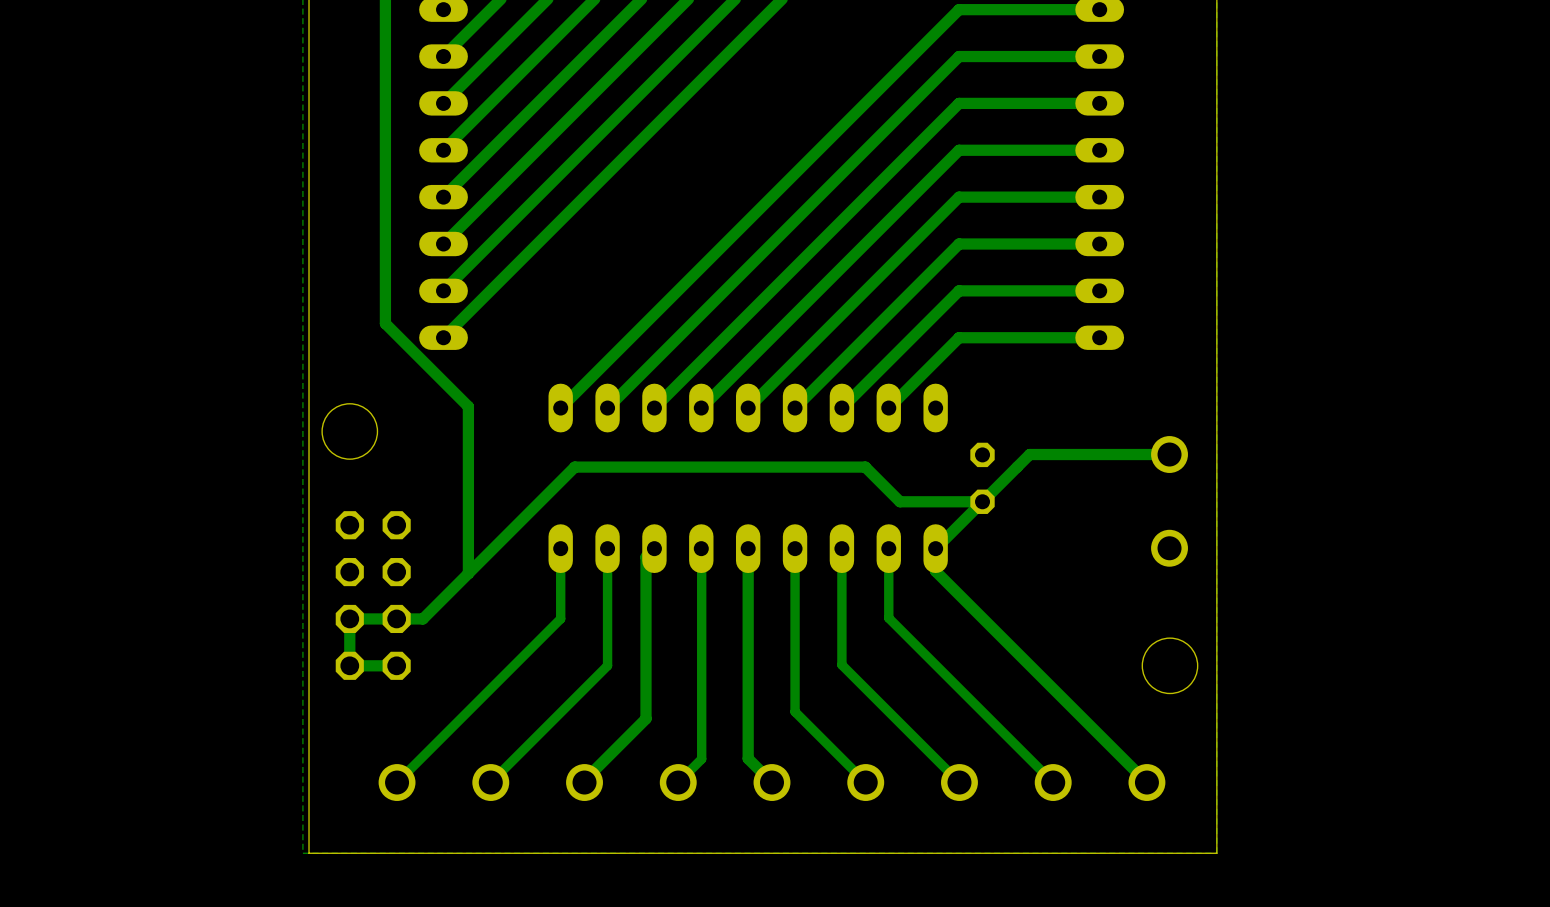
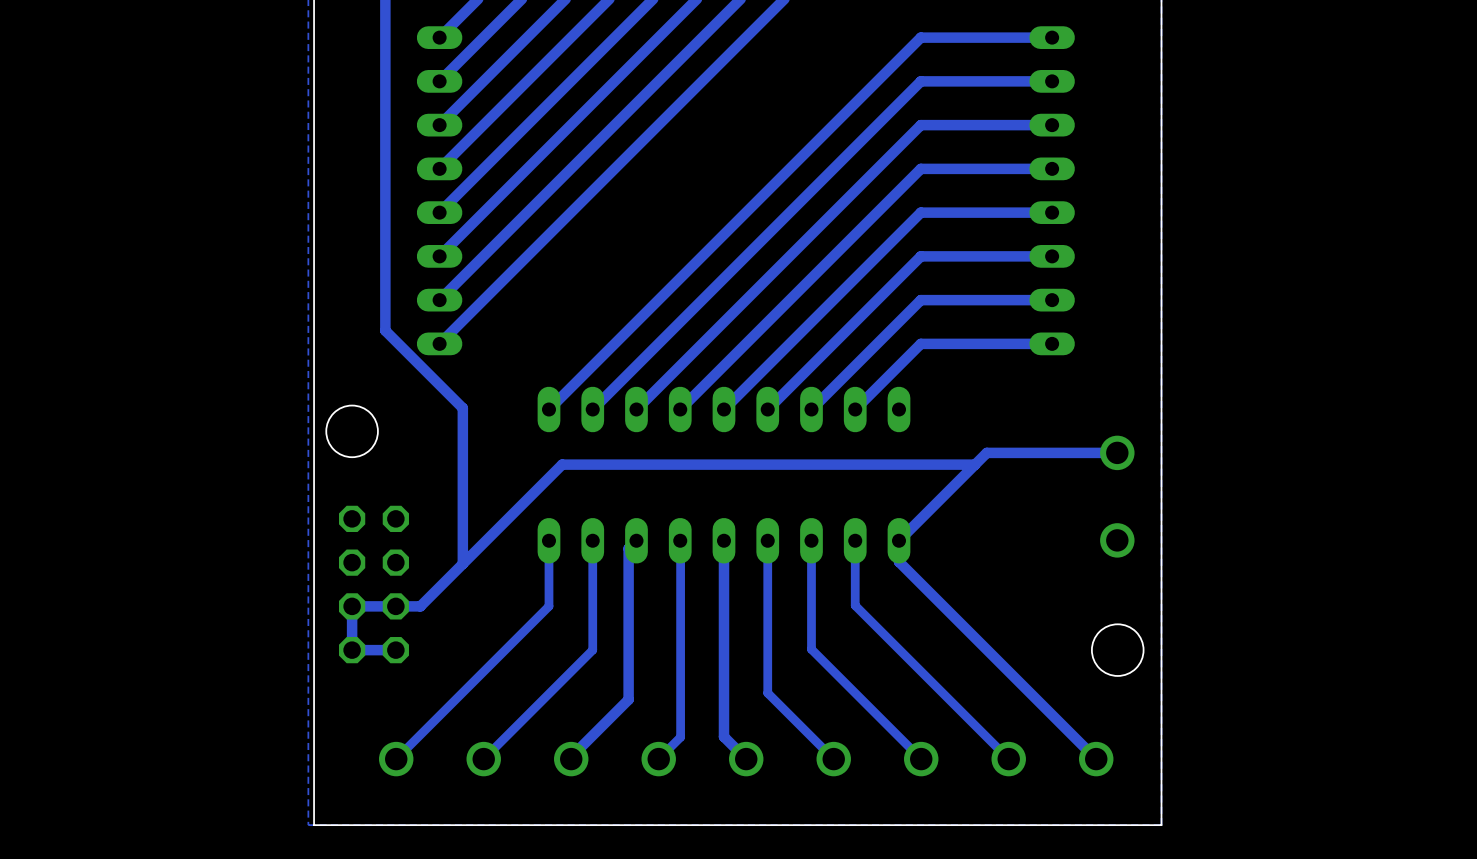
bottom track: (865, 467) (900, 501) (982, 501) -> (833, 464) (975, 464)
part: (982, 478) -> none

